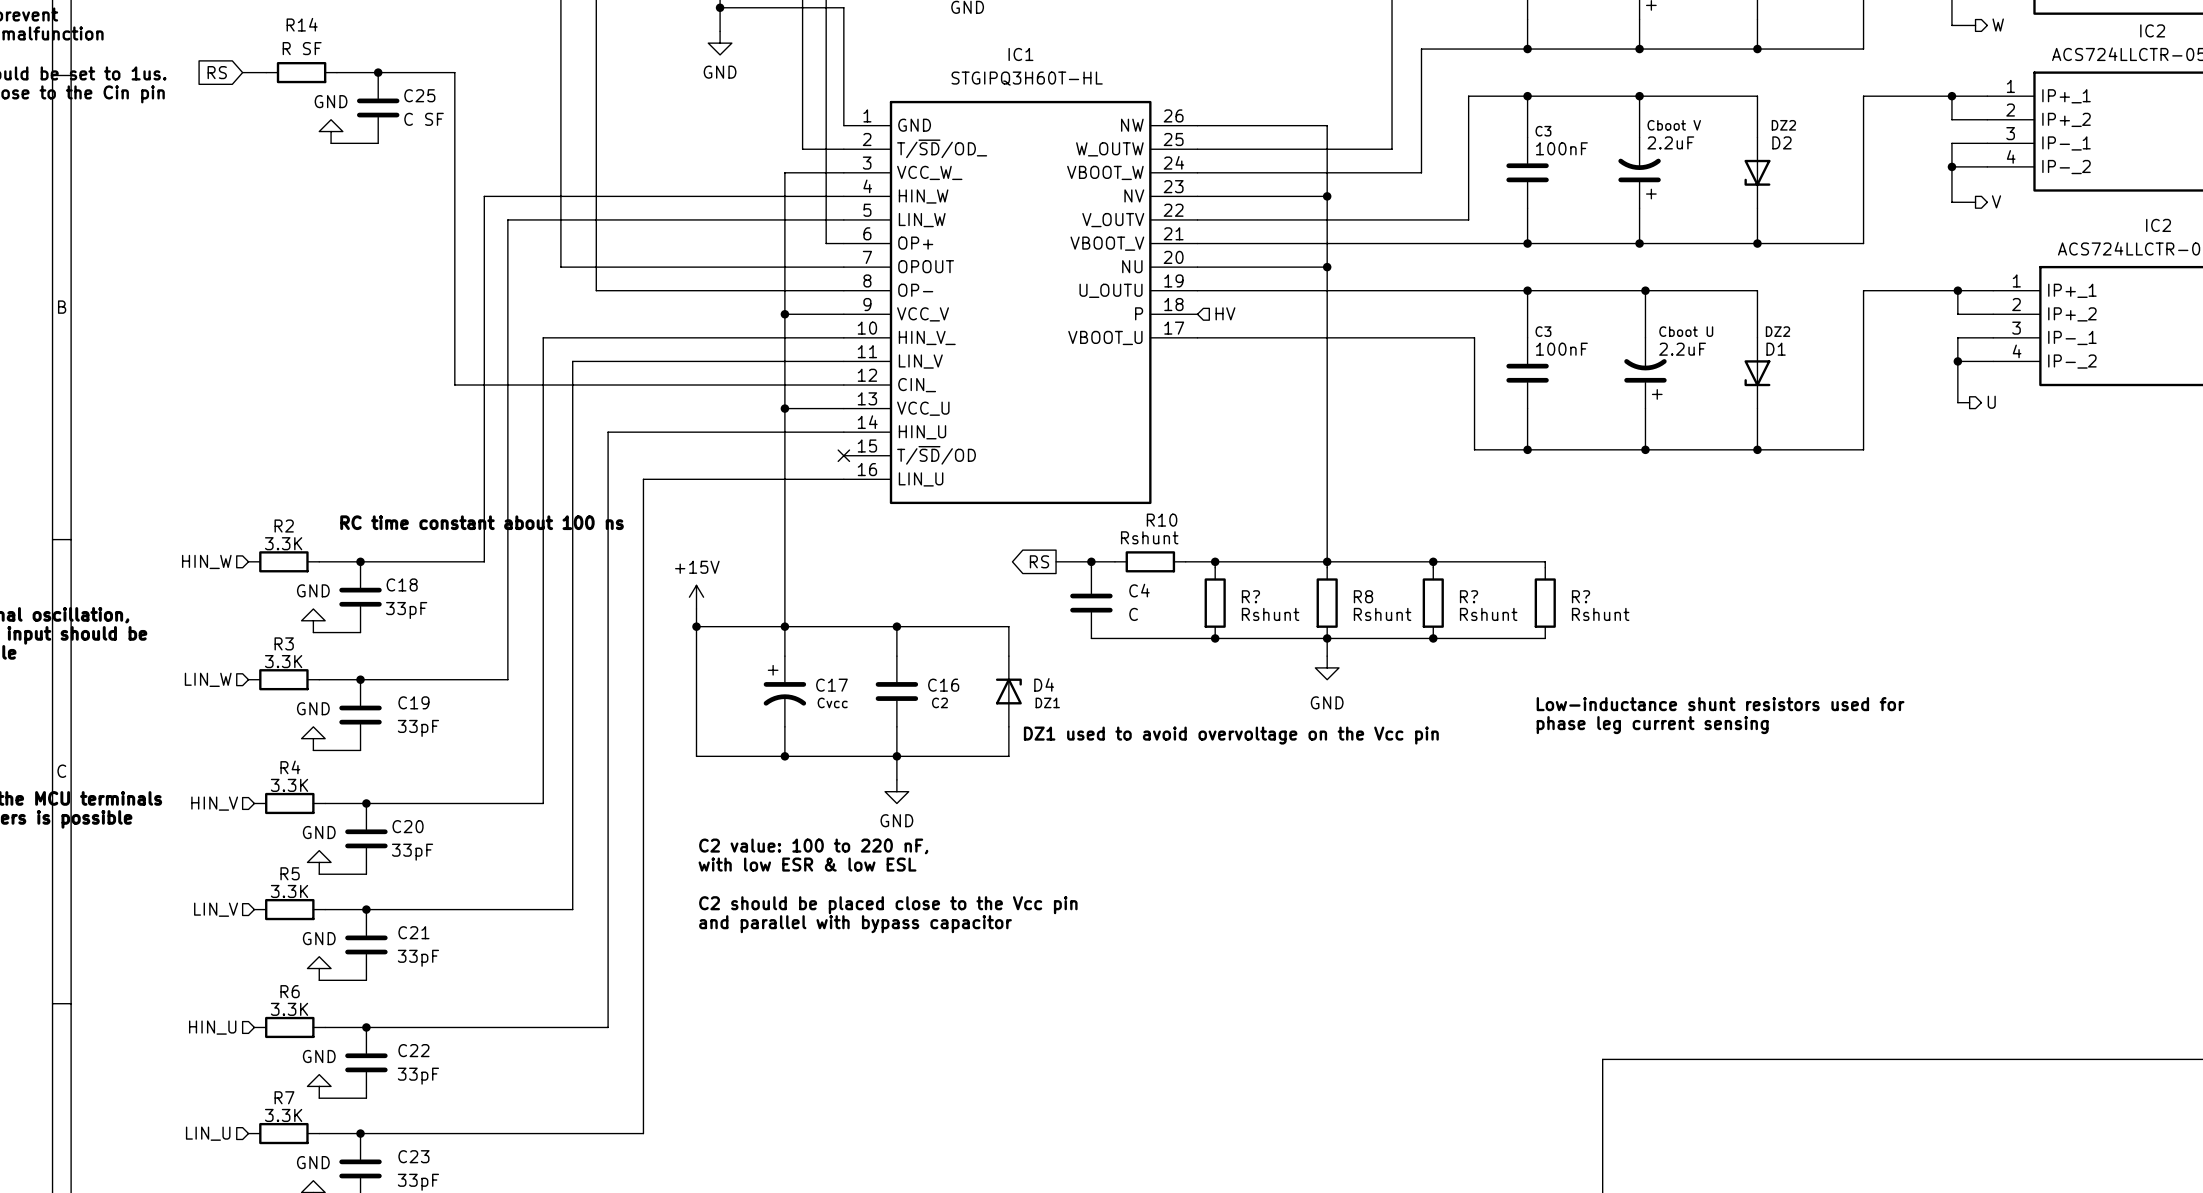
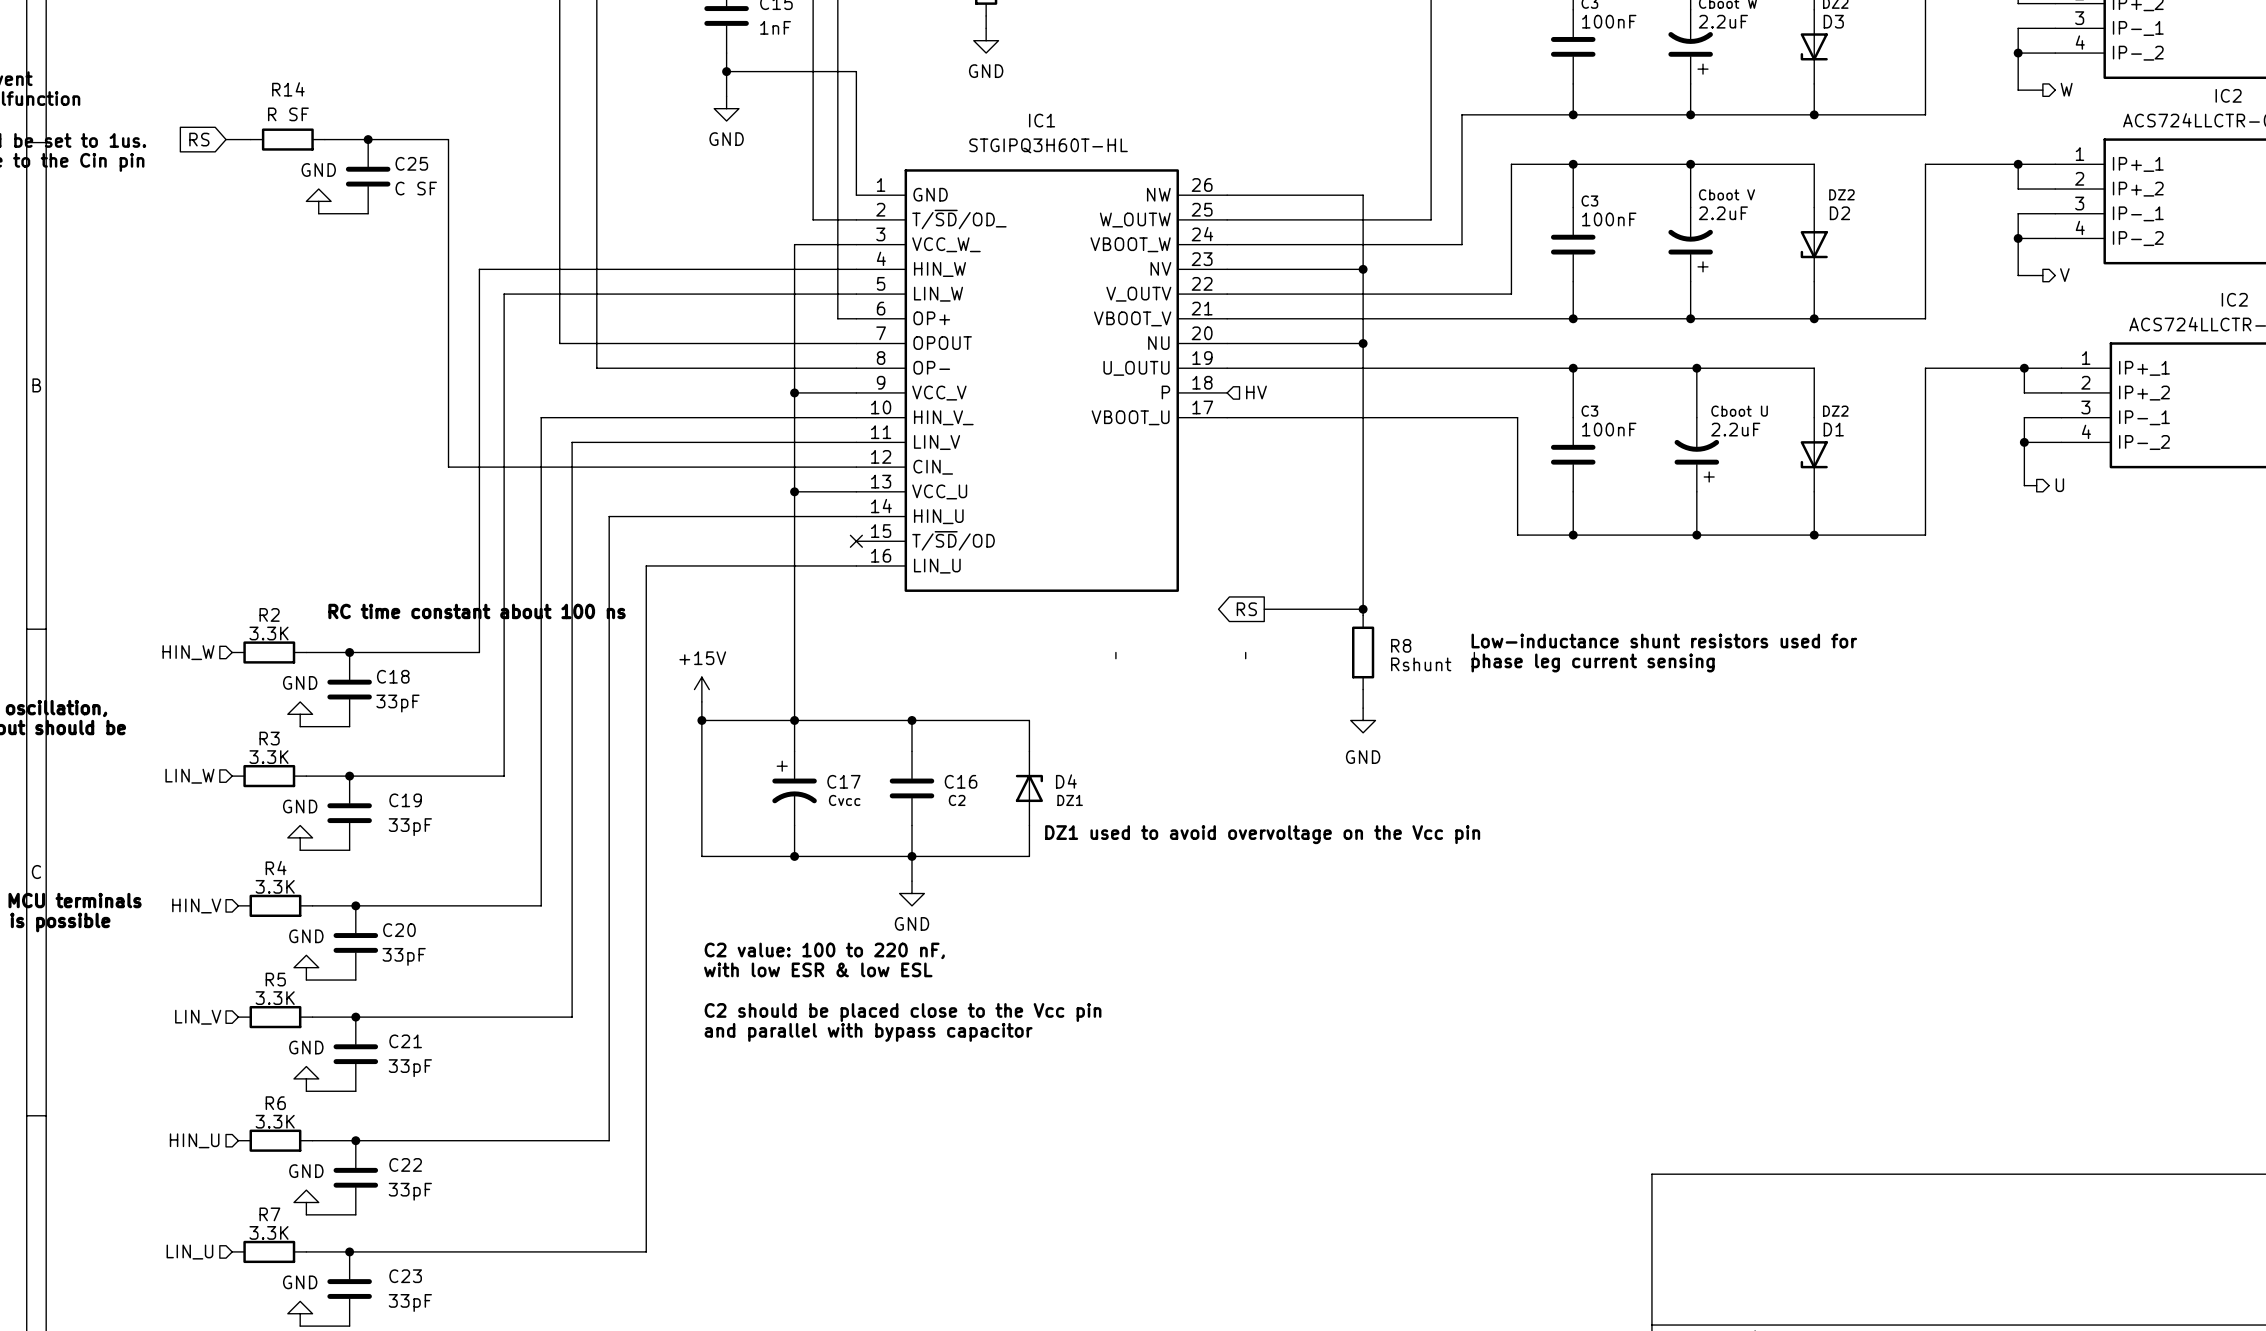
wire: none -> (1264, 609) (1363, 609)
wire: (1327, 526) (1327, 567) -> none
global label position: RS (1039, 561) -> RS (1246, 609)
wire: (1056, 561) (1114, 561) -> none
junction: (1091, 561) -> none
R10: Rshunt (1150, 561) -> none
wire: (1185, 561) (1545, 561) (1545, 567) -> none
junction: (1215, 561) -> none
junction position: (1327, 561) -> (1363, 609)
junction: (1433, 561) -> none
C4: C (1091, 603) -> none
R?: Rshunt (1215, 603) -> none
R8 position: (1327, 603) -> (1363, 652)
R?: Rshunt (1433, 603) -> none
R?: Rshunt (1545, 603) -> none
wire: (1091, 638) (1545, 638) -> none
junction: (1215, 638) -> none
wire: (1327, 638) (1327, 656) -> (1363, 689) (1363, 708)
junction: (1327, 638) -> none
junction: (1433, 638) -> none
power symbol position: GND (1327, 667) -> GND (1363, 720)
text position: Low-inductance shunt resistors used for (1720, 704) -> Low-inductance shunt resistors used for (1664, 641)
text position: phase leg current sensing (1652, 725) -> phase leg current sensing (1593, 662)

